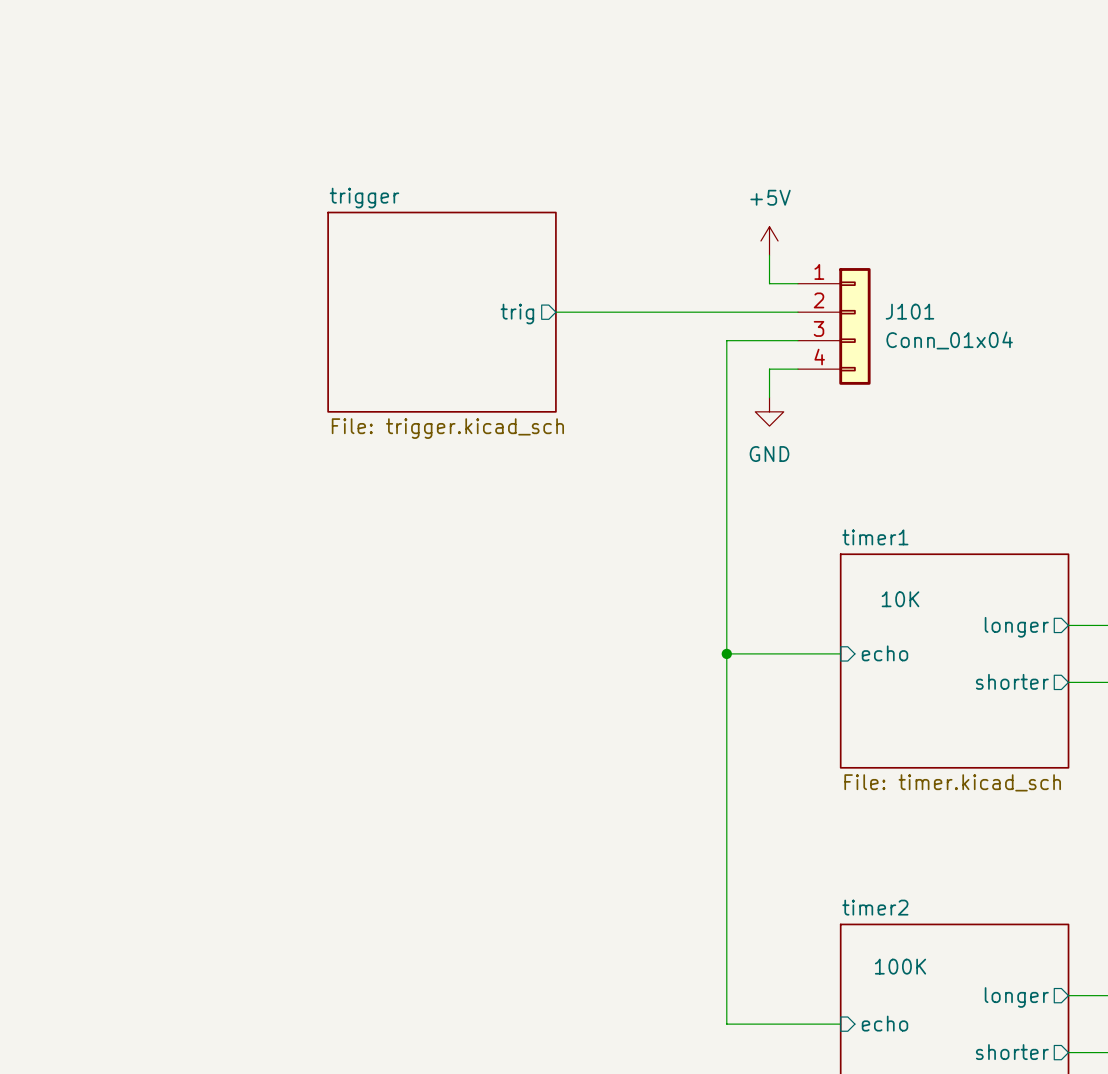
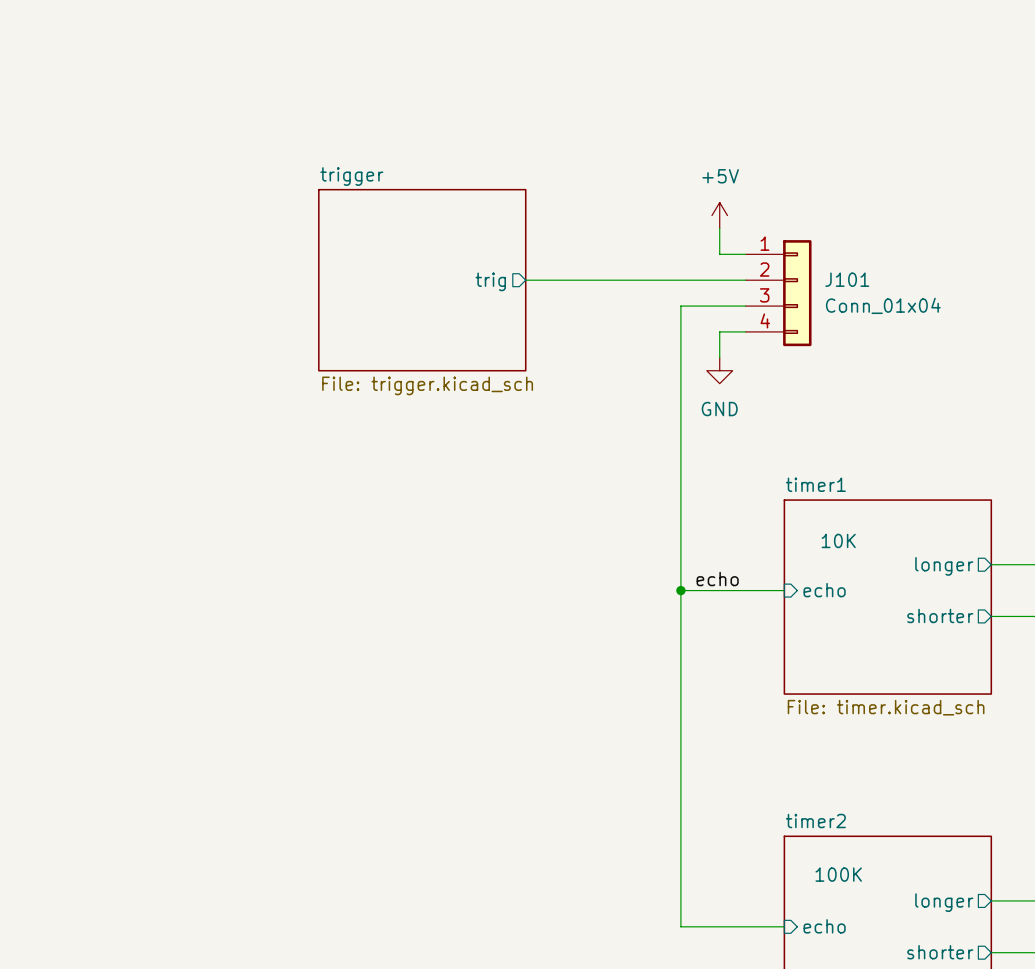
label: none -> echo (717, 579)

